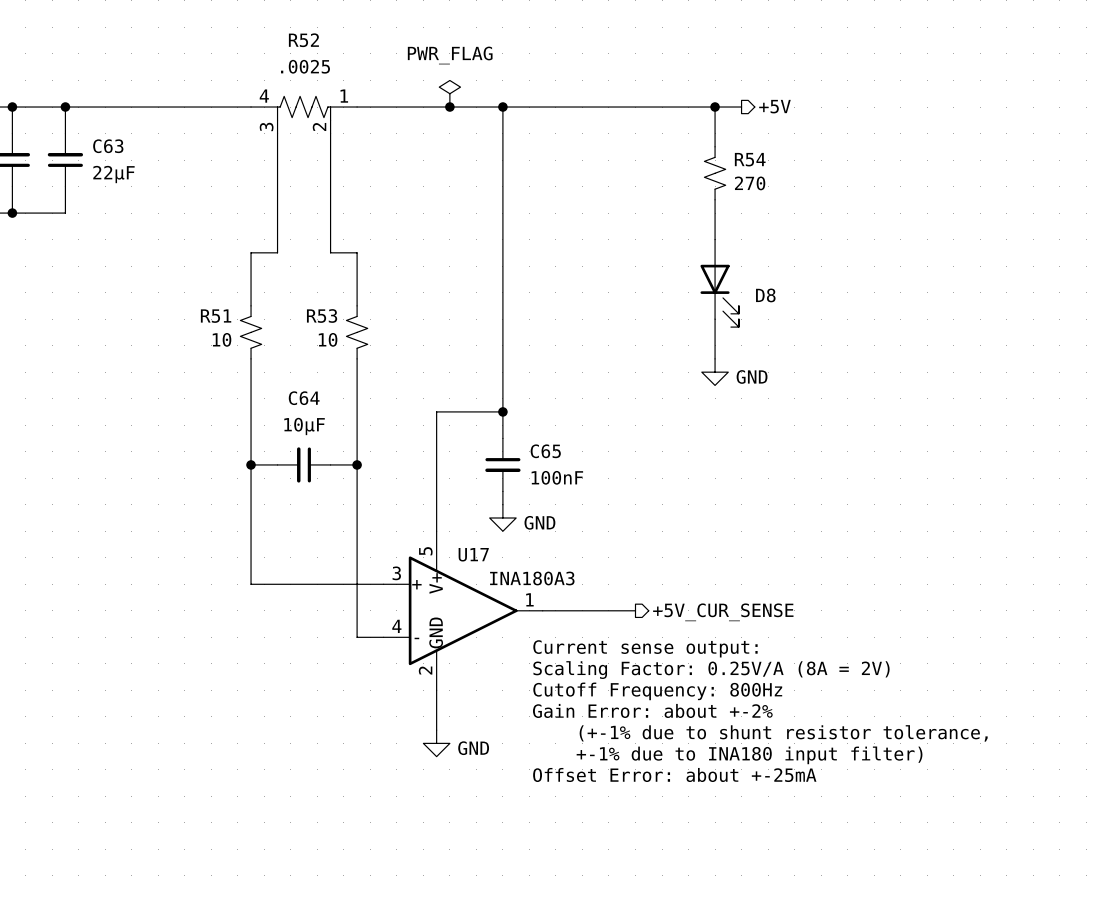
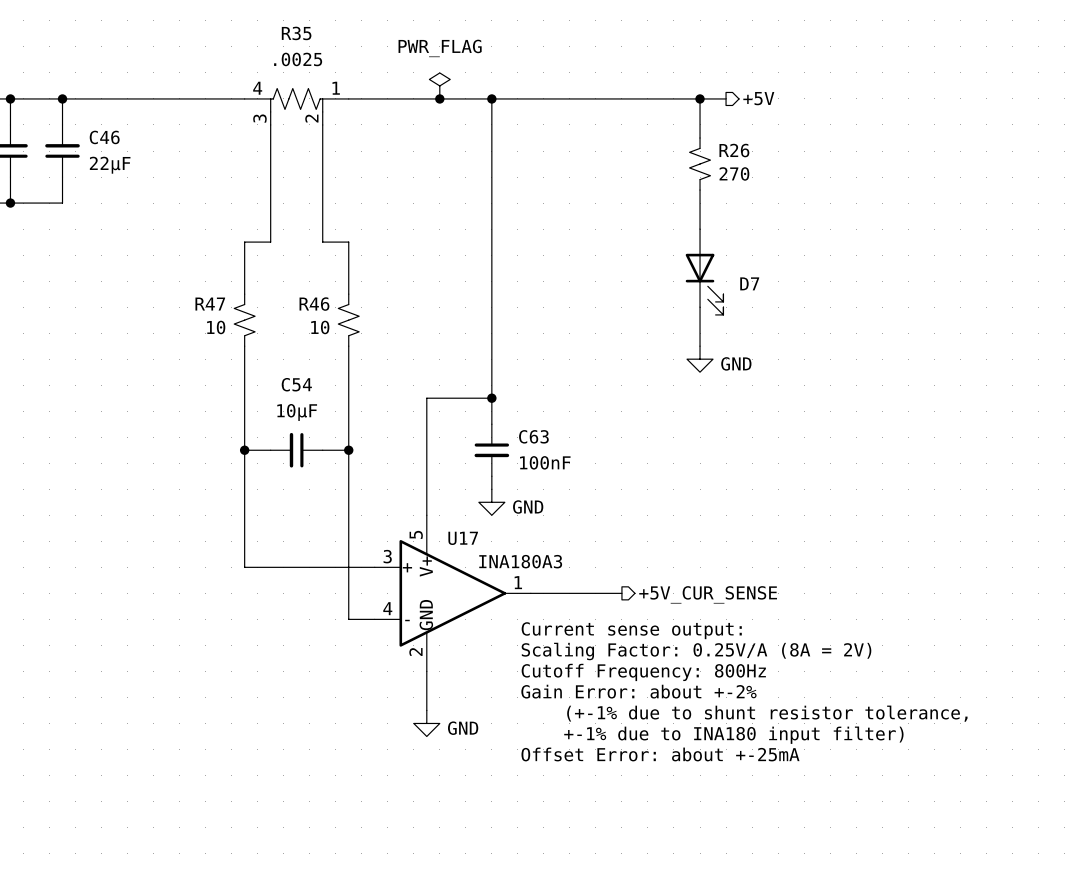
R52 name: R52 (303, 40) -> R35 (296, 33)
C63 name: C63 (108, 146) -> C46 (104, 137)
R54 name: R54 (750, 159) -> R26 (734, 150)
D8 name: D8 (765, 295) -> D7 (749, 283)
R53 name: R53 (322, 315) -> R46 (314, 304)
R51 name: R51 (216, 316) -> R47 (210, 304)
C64 name: C64 (304, 398) -> C54 (296, 384)
C65 name: C65 (545, 451) -> C63 (533, 436)

